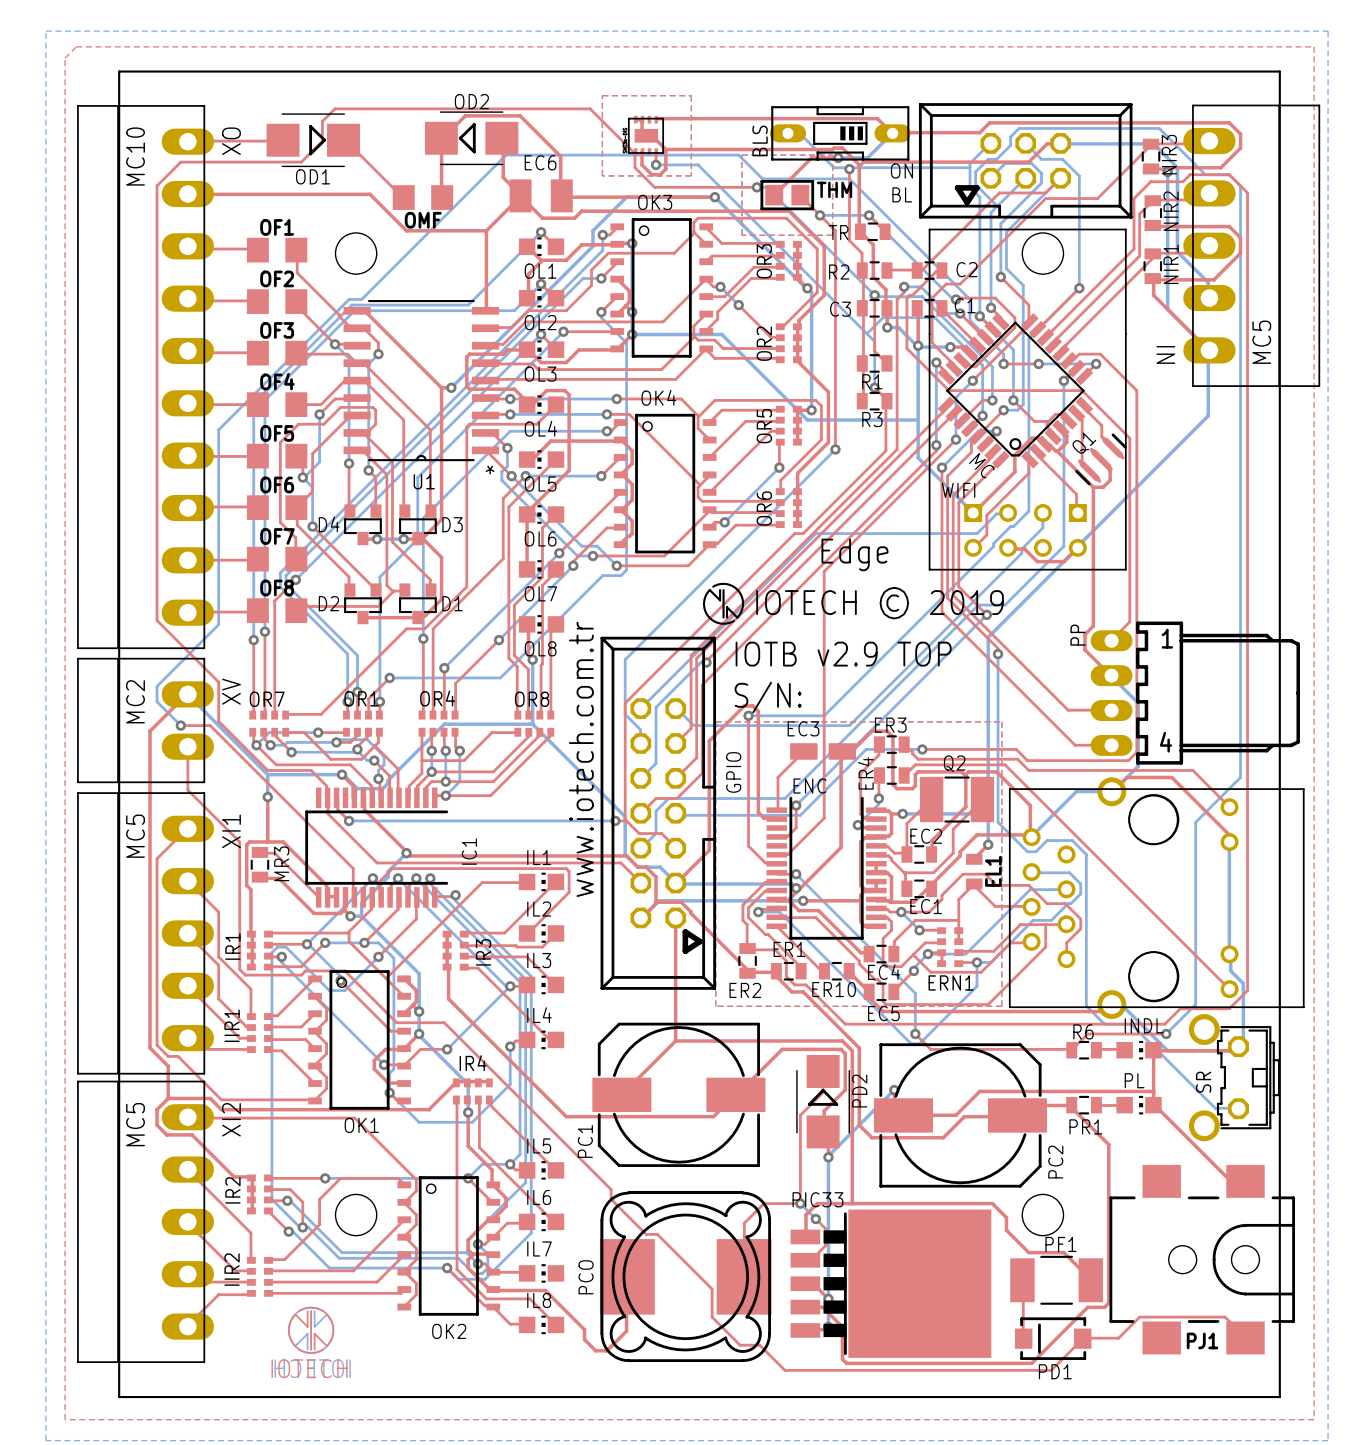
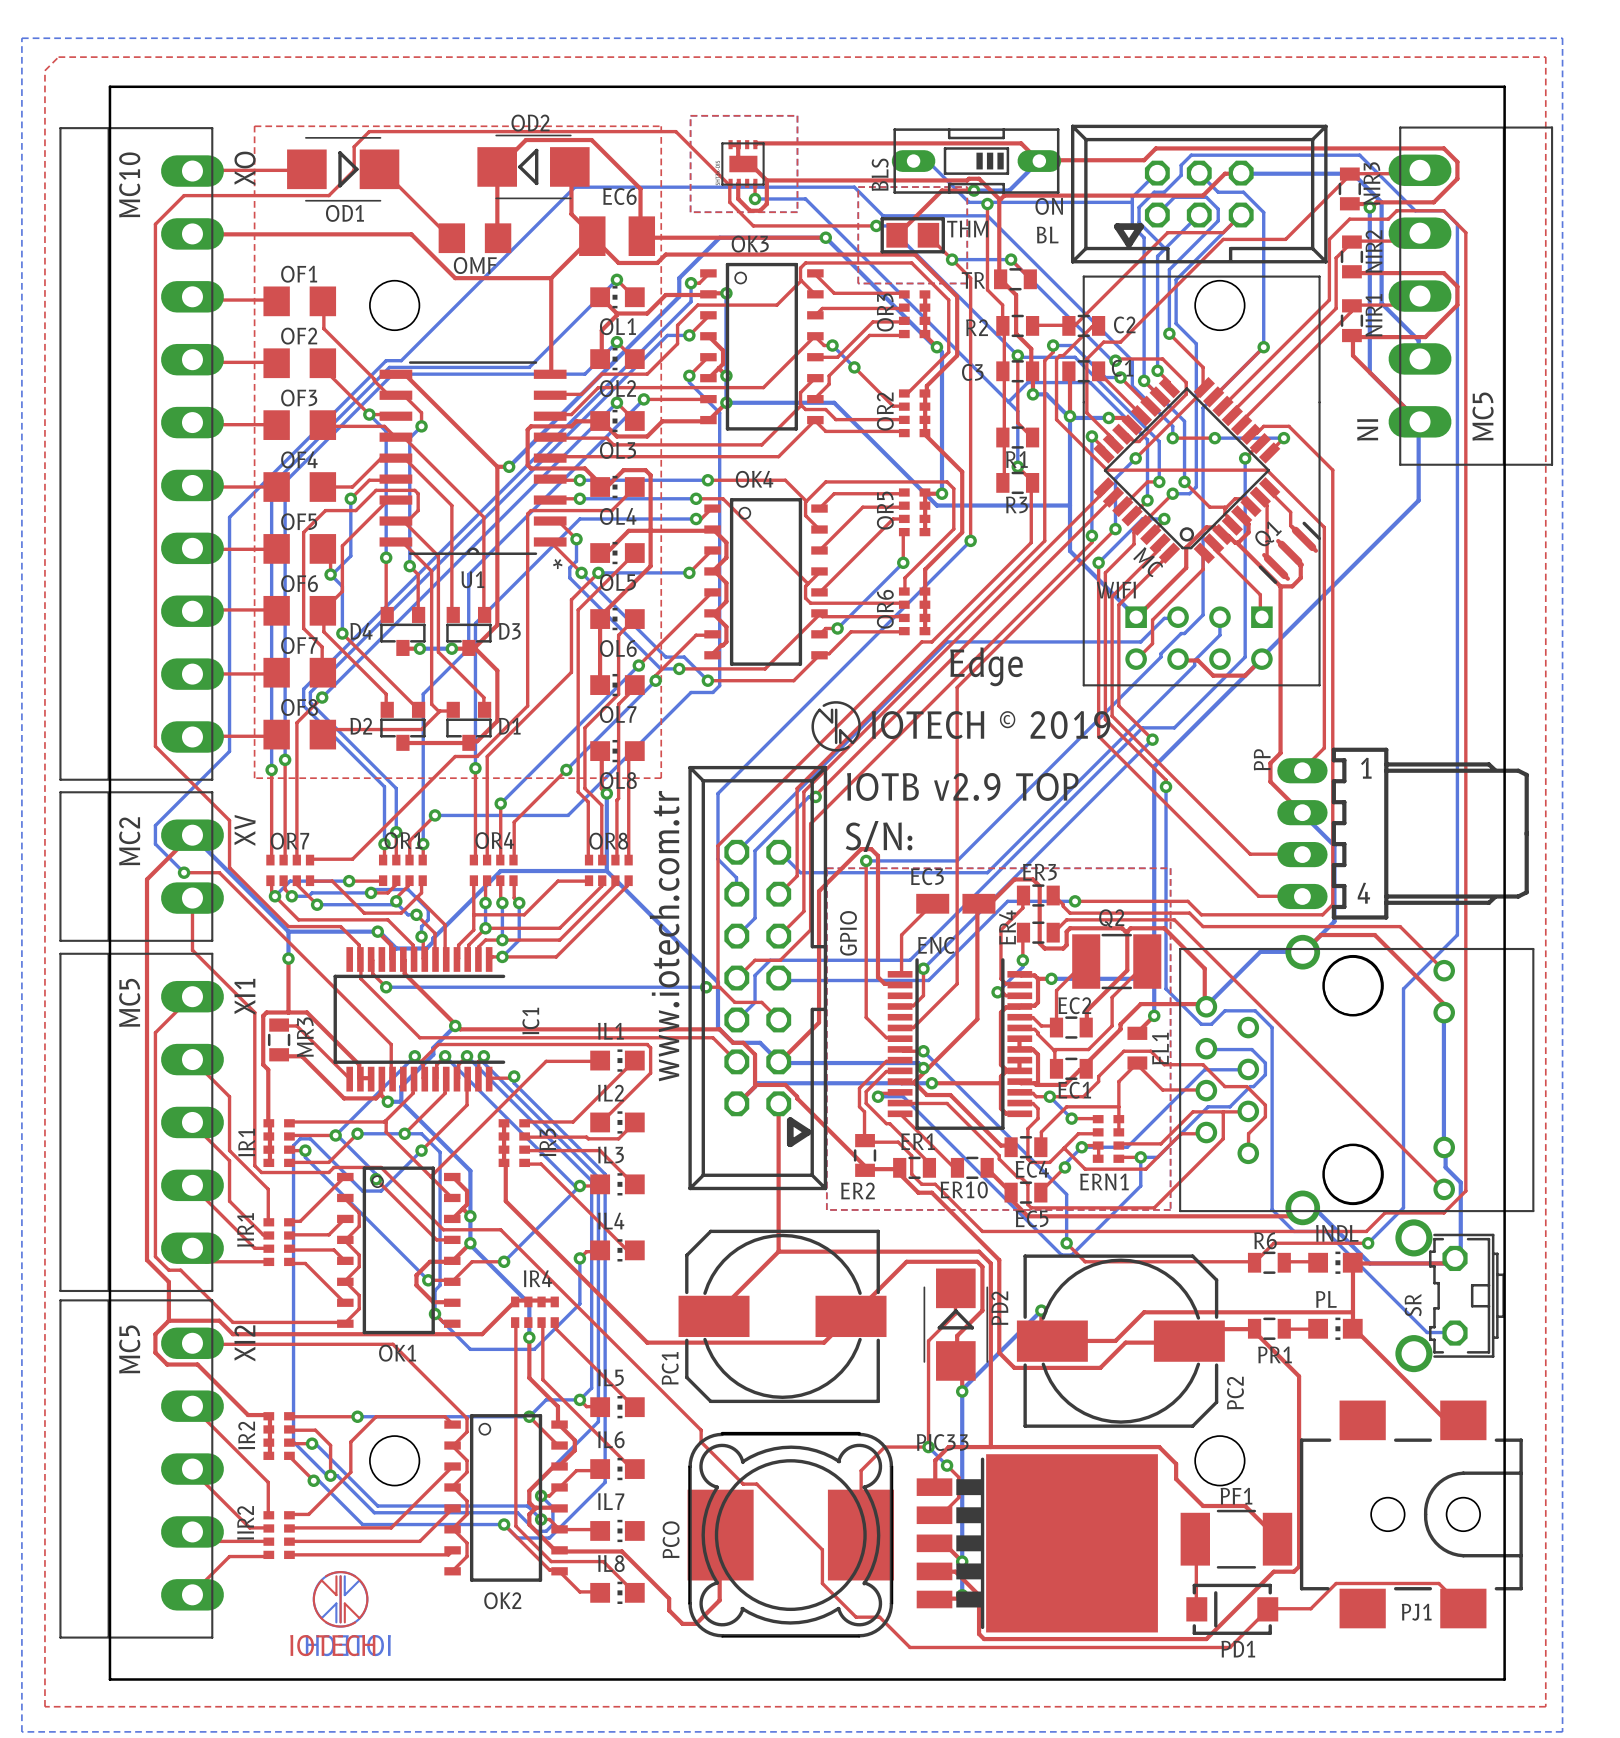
top zone outline: none -> (254, 126) (661, 126) (661, 778) (254, 778) (254, 126)

